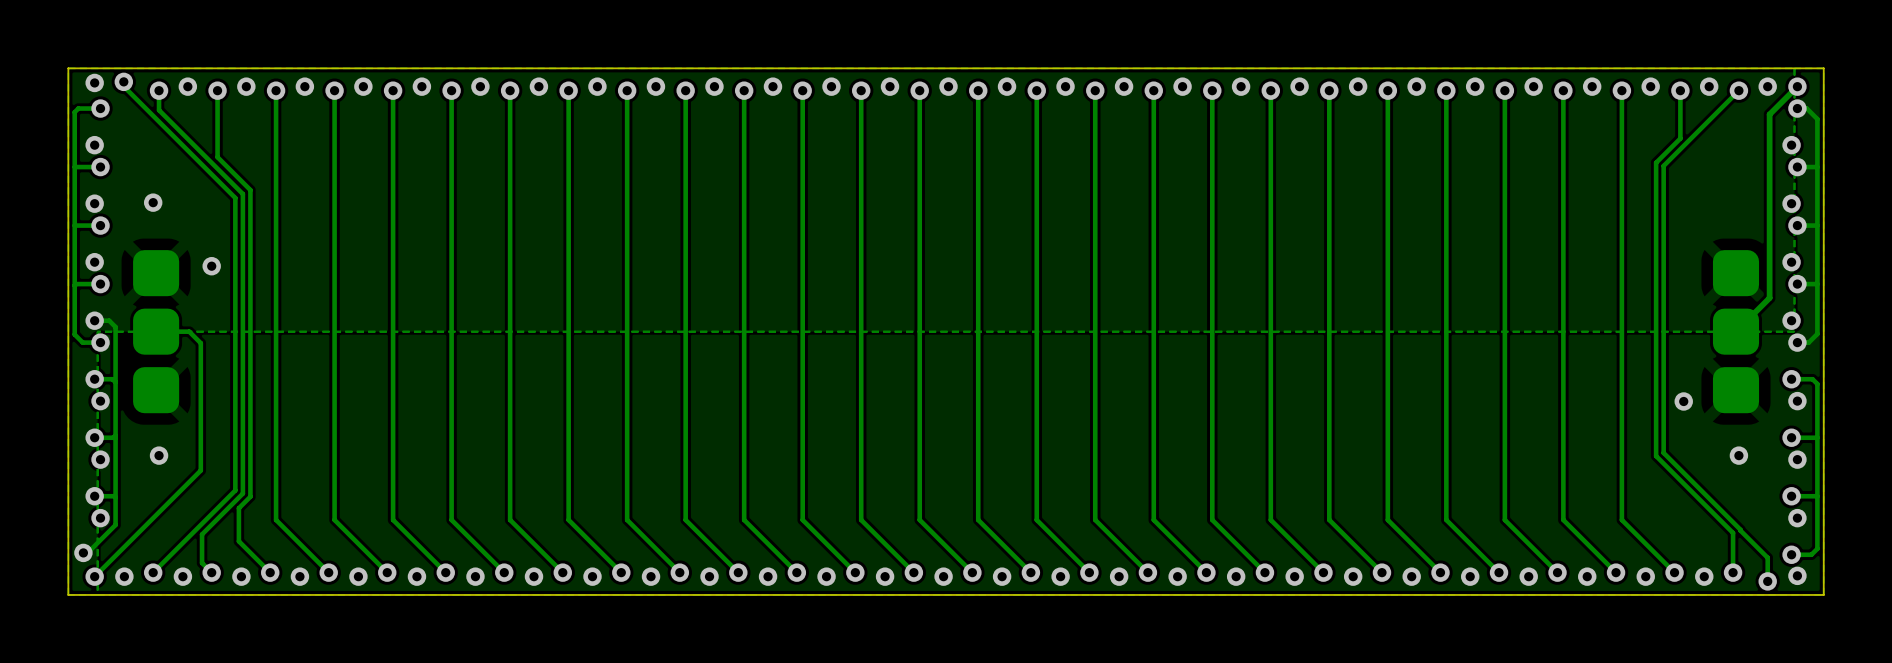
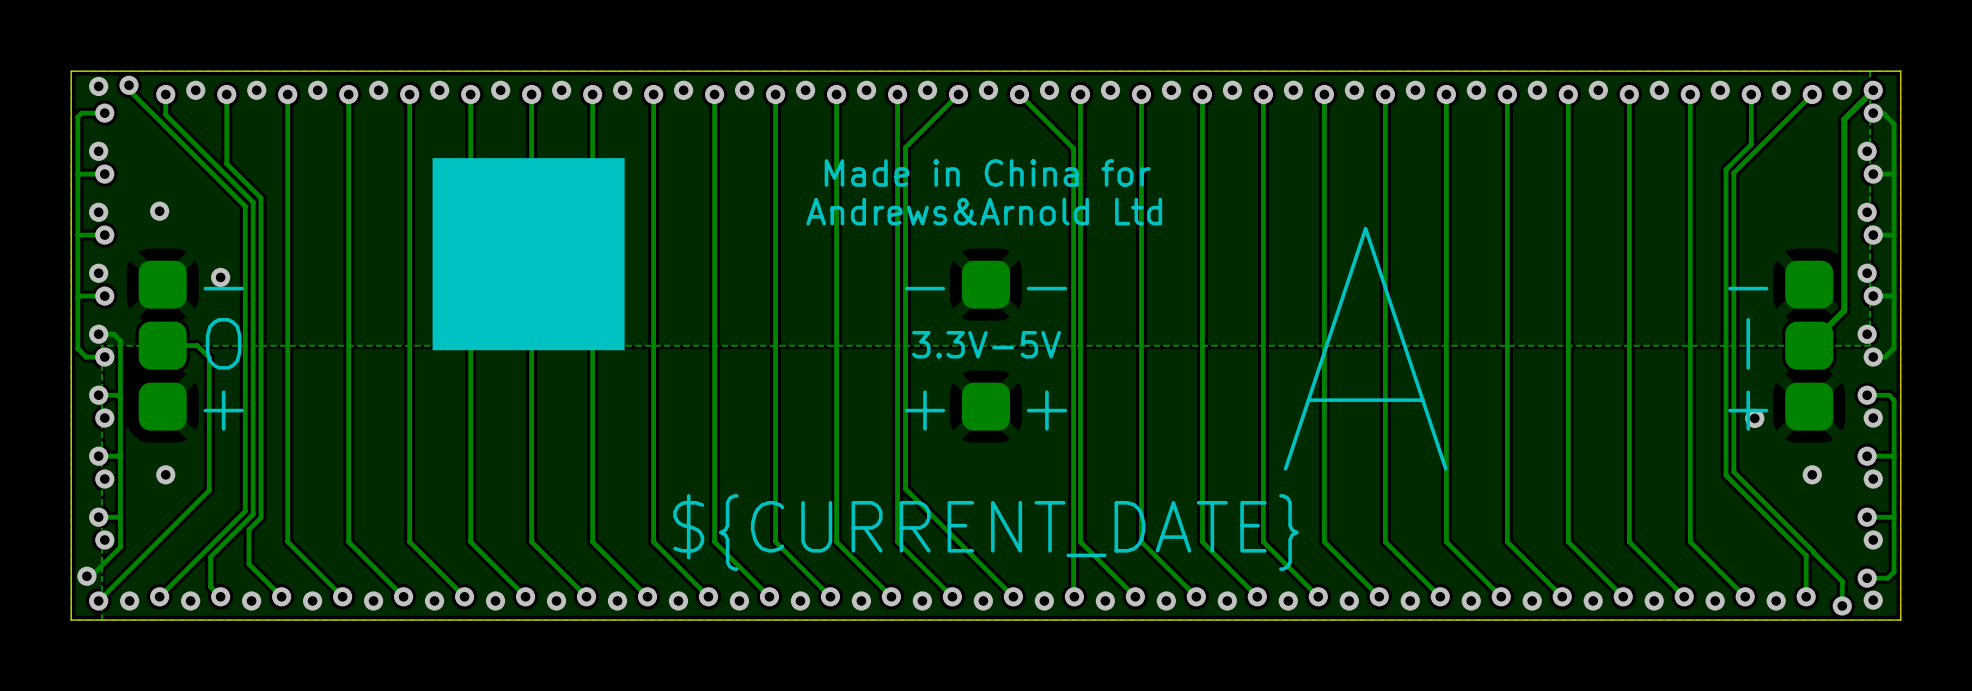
track: (919, 90) (919, 519) -> (958, 94) (905, 147) (905, 488) (958, 541)
track: (978, 90) (978, 519) (1030, 571) -> (1019, 94) (1073, 148) (1073, 596)
drawing: none -> [432, 158, 625, 351]
text: none -> Made in China for (987, 172)
text: none -> Andrews&Arnold Ltd (984, 211)
part: none -> (985, 284)
text: none -> - (223, 288)
text: none -> - (924, 288)
text: none -> - (1046, 288)
text: none -> - (1748, 288)
text: none -> O (223, 343)
text: none -> I (1748, 343)
text: none -> 3.3V-5V (986, 344)
text: none -> A (1365, 348)
text: none -> + (223, 410)
text: none -> + (924, 410)
text: none -> + (1046, 410)
text: none -> + (1748, 410)
part: none -> (985, 406)
text: none -> ${CURRENT_DATE} (985, 532)

